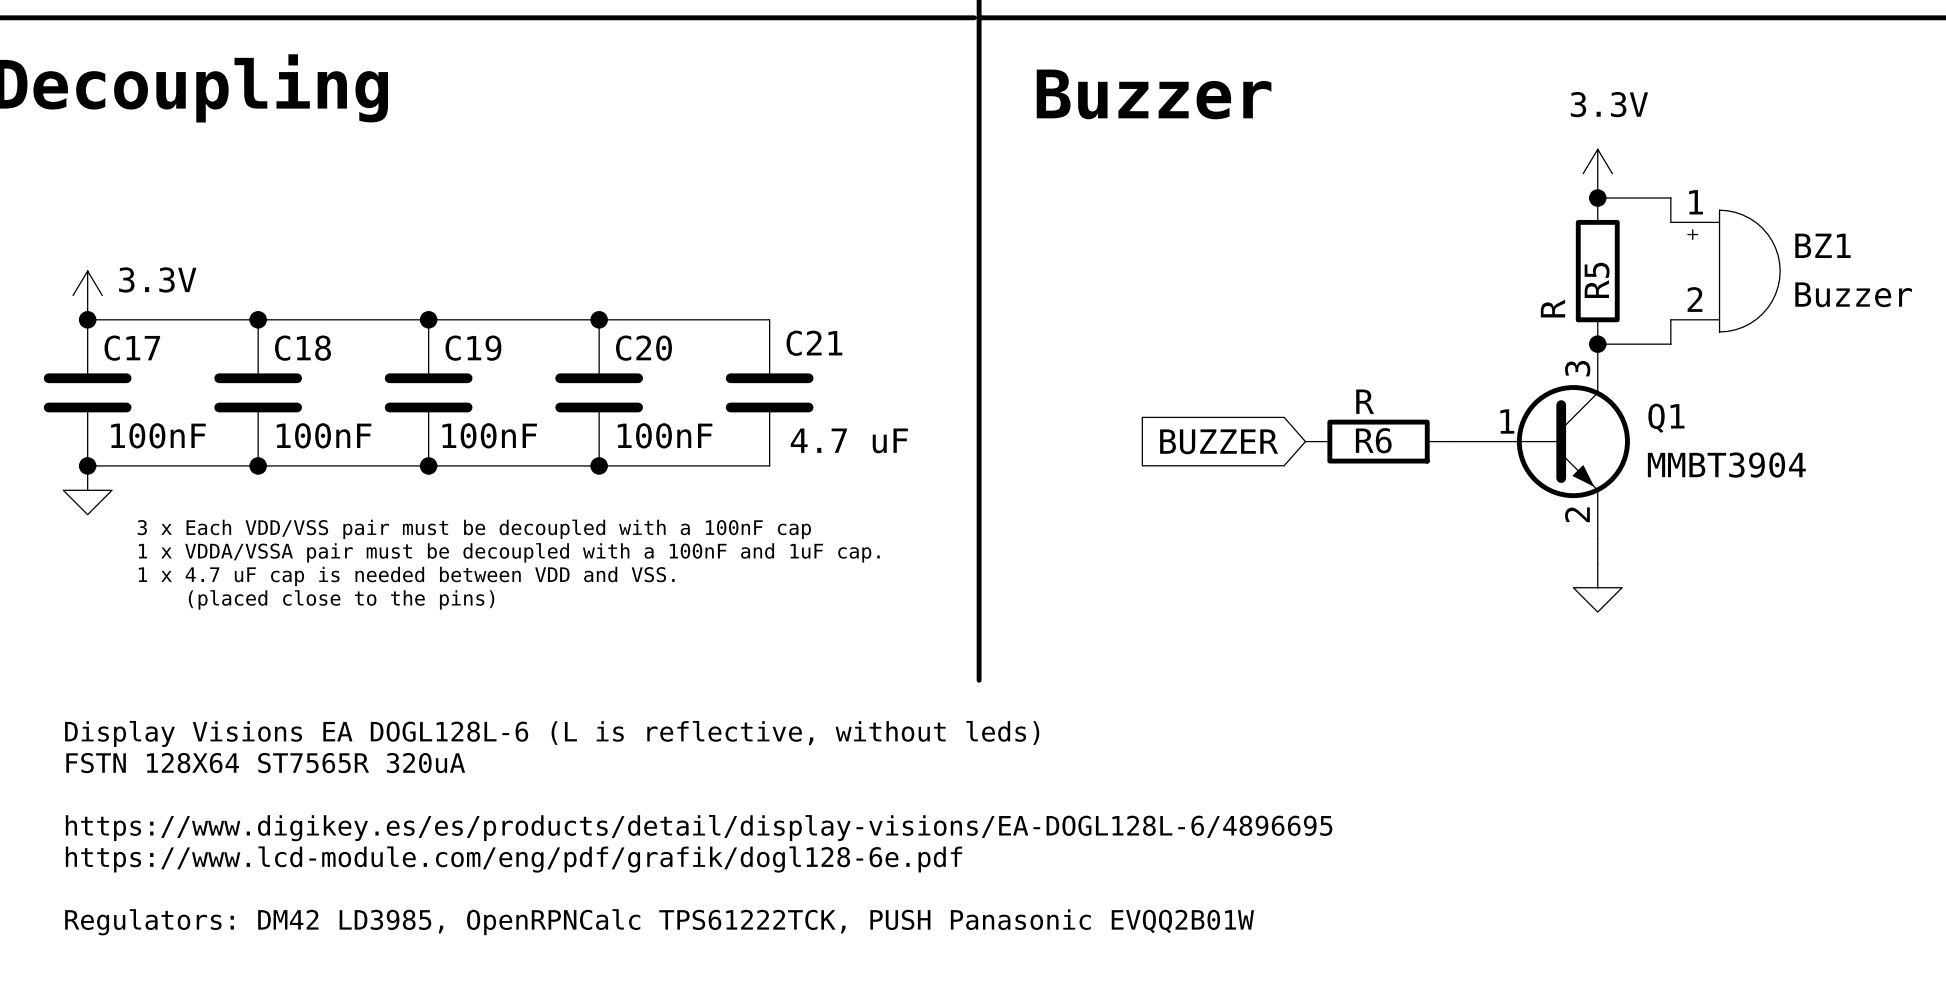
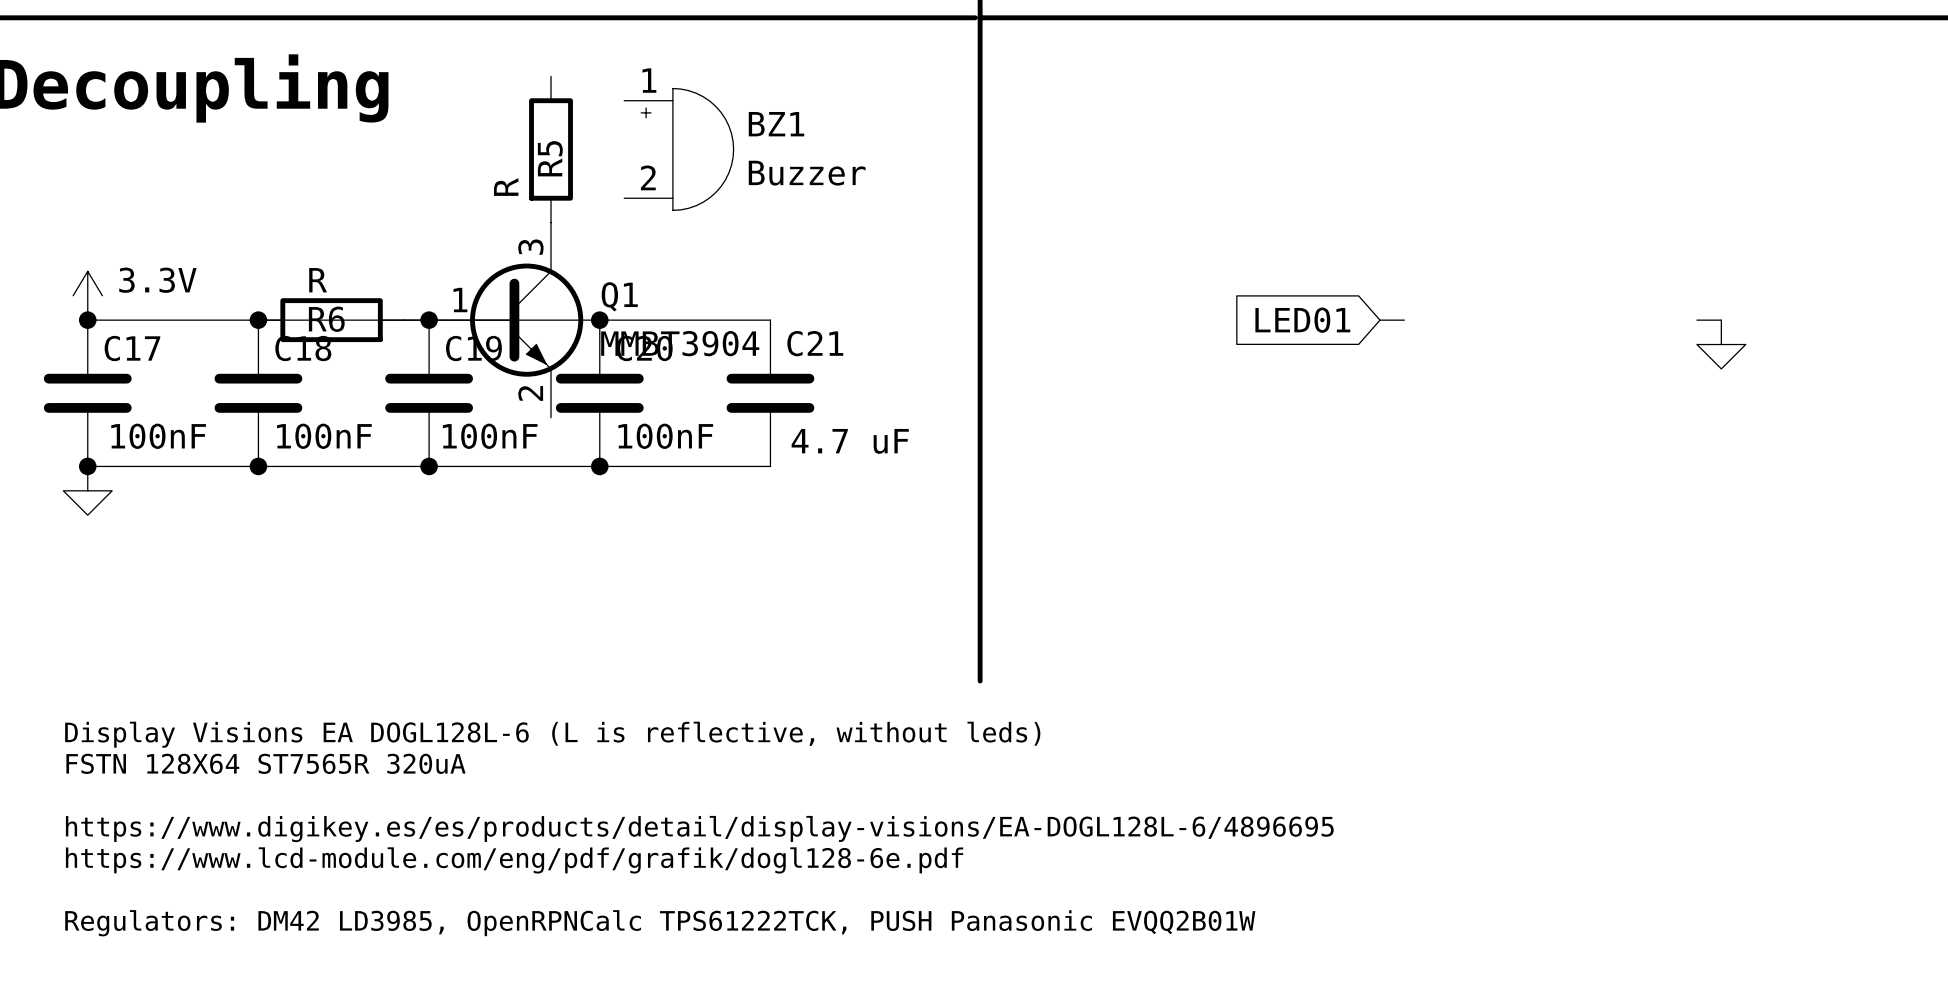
text: Buzzer (1154, 94) -> none
power symbol: 3.3V (1597, 173) -> none
wire: (1597, 198) (1670, 198) (1670, 222) -> none
junction: (1597, 198) -> none
R5 position: (1597, 271) -> (551, 149)
BZ1 position: (1725, 271) -> (678, 149)
global label: none -> LED01 (1302, 320)
wire: none -> (1380, 320) (1404, 320)
wire: (1670, 319) (1670, 344) (1597, 344) -> none
junction: (1597, 344) -> none
global label: BUZZER (1219, 441) -> none
R6 position: (1378, 441) -> (331, 320)
Q1 position: (1540, 441) -> (493, 320)
text: 3 x Each VDD/VSS pair must be decoupled with a 100nF cap (474, 529) -> none
wire: (1597, 539) (1597, 563) -> none
text: 1 x VDDA/VSSA pair must be decoupled with a 100nF and 1uF cap. (509, 552) -> none
text: 1 x 4.7 uF cap is needed between VDD and VSS. (406, 576) -> none
power symbol position: (1597, 587) -> (1721, 344)
text: (placed close to the pins) (341, 599) -> none

